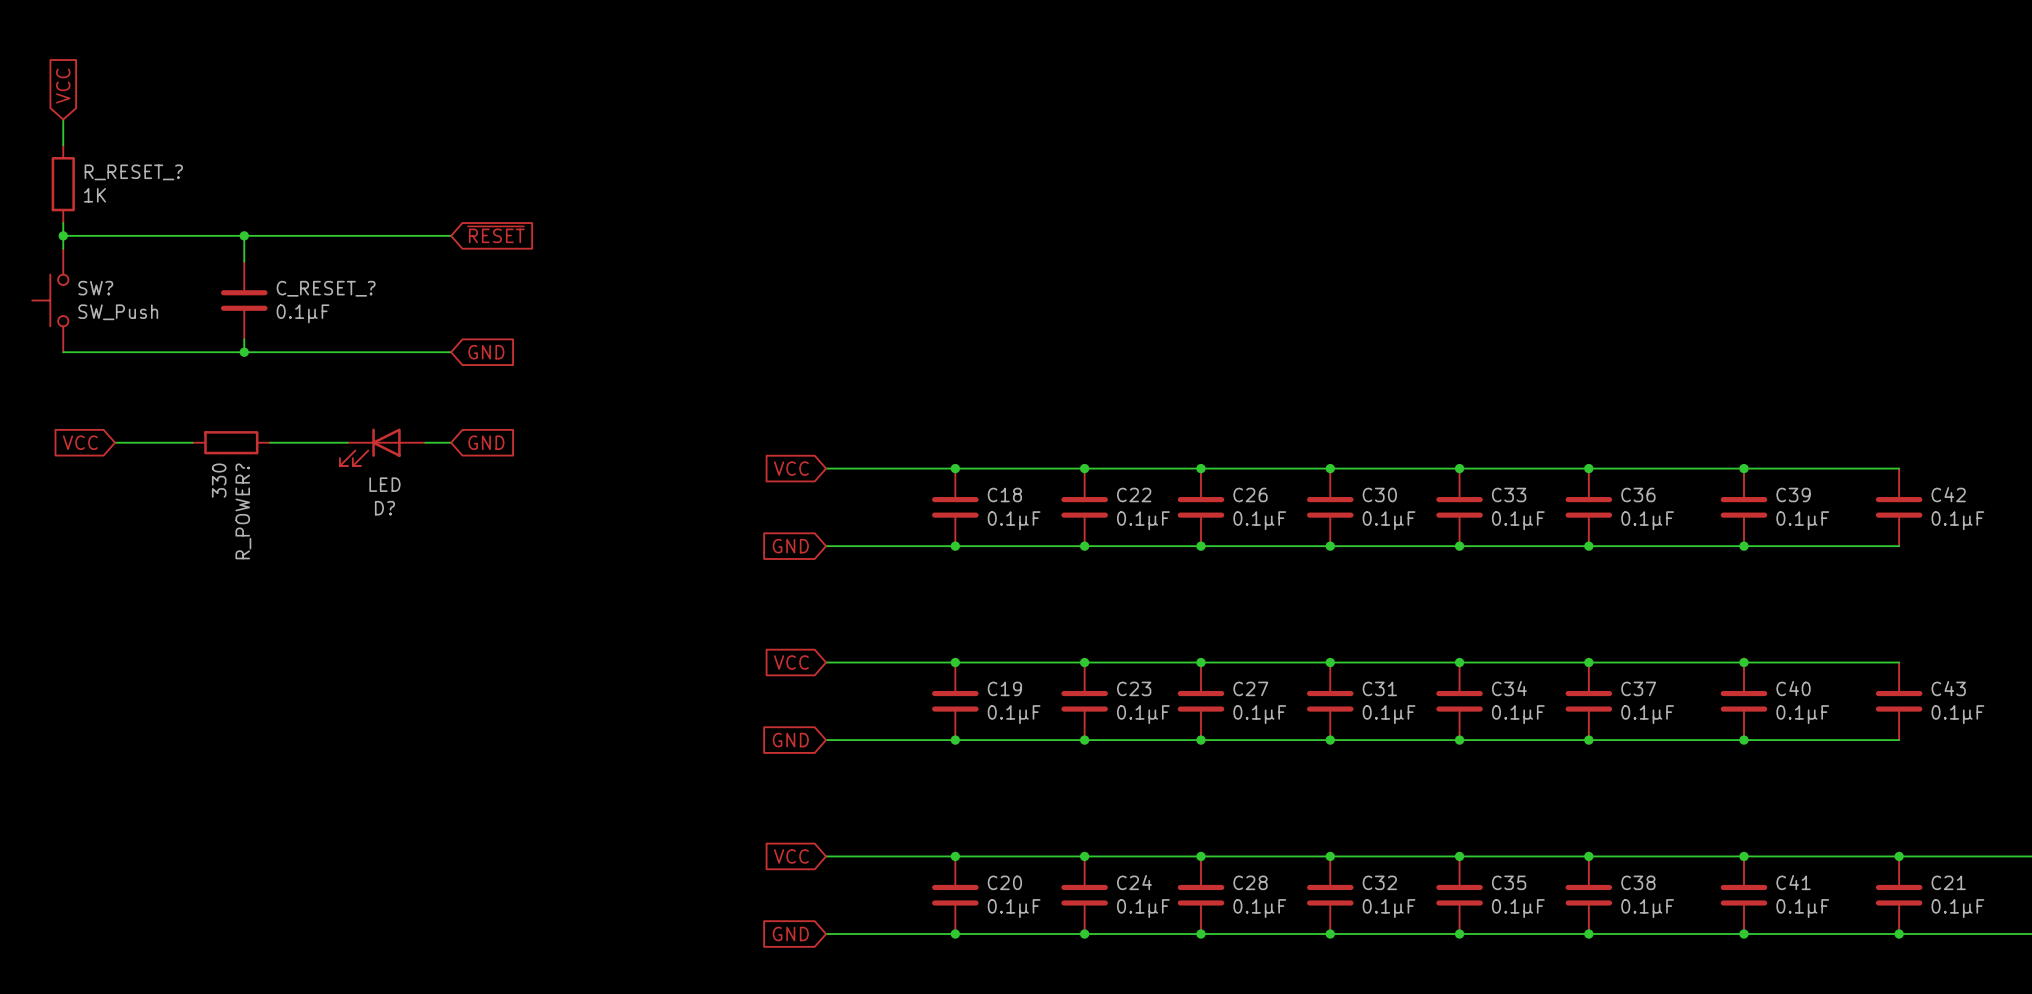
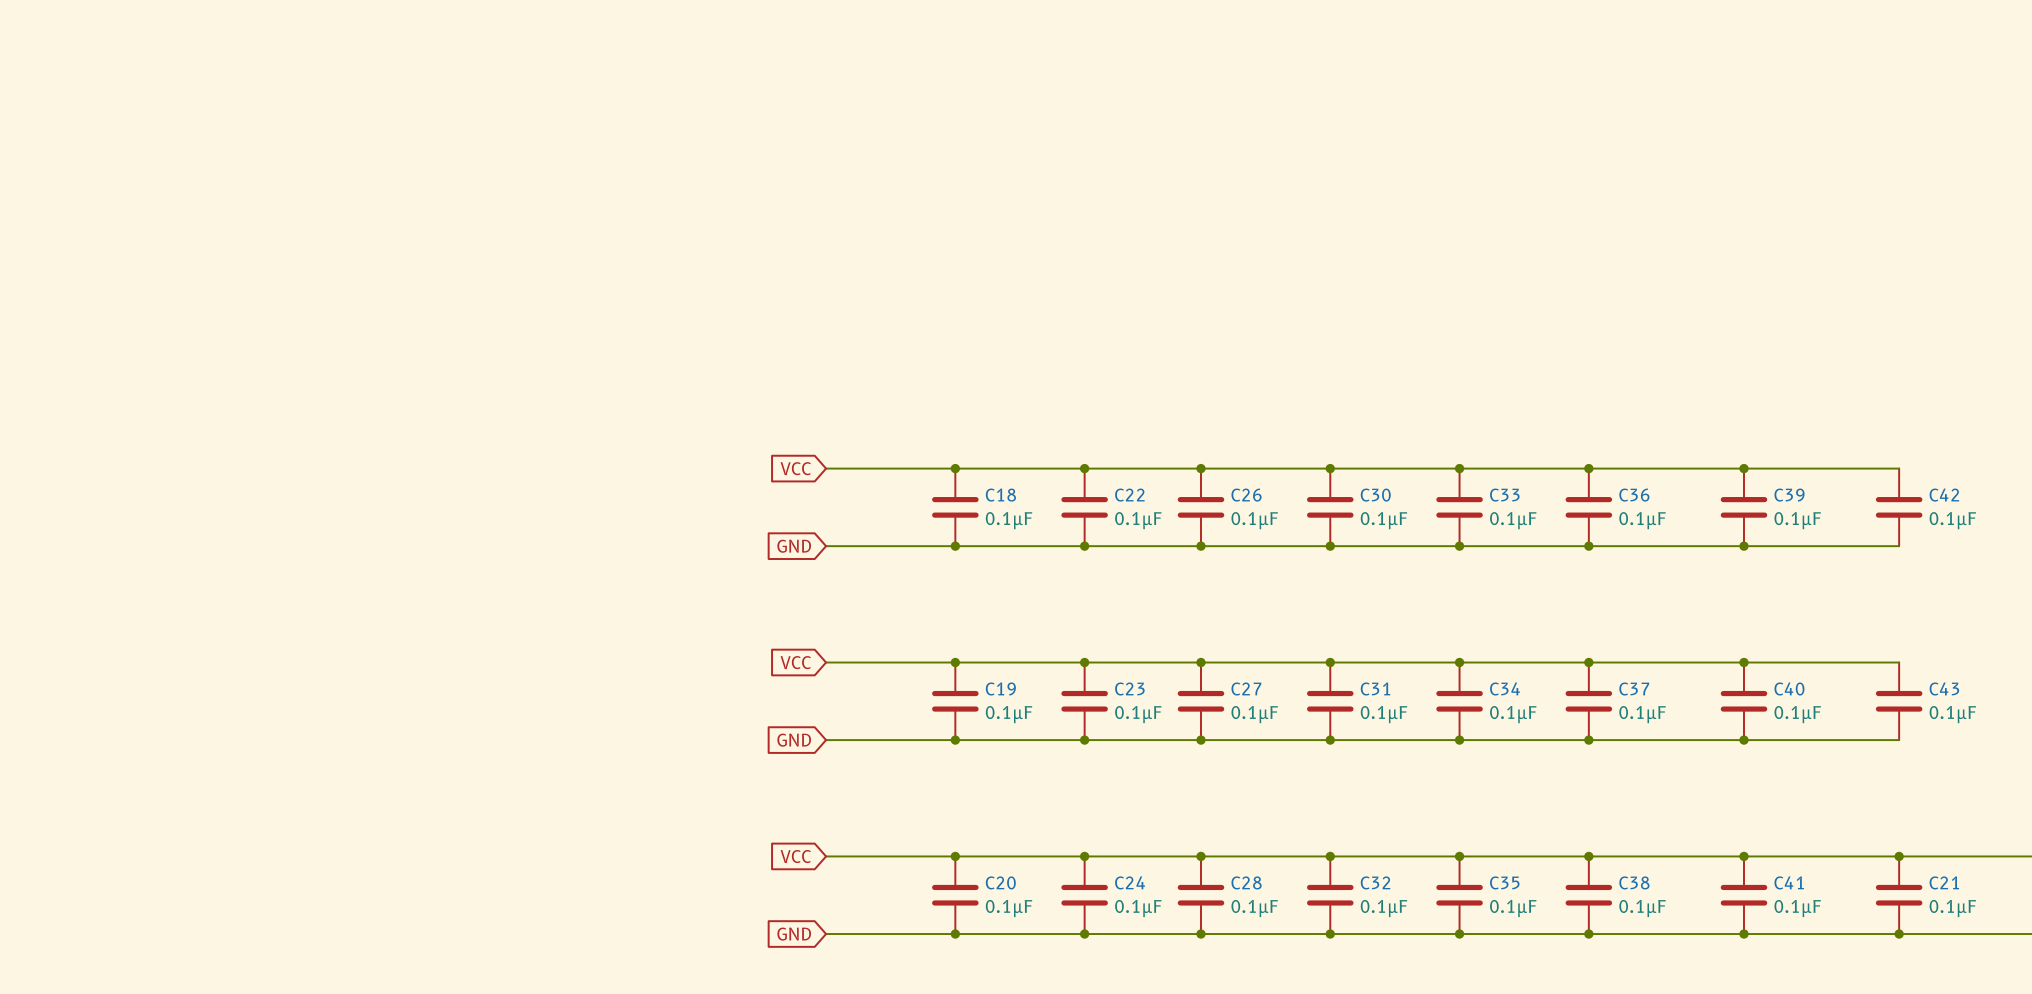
global label: VCC (63, 86) -> none
wire: (63, 119) (63, 145) -> none
R_RESET_?: 1K (63, 184) -> none
wire: (63, 222) (63, 248) -> none
global label: ~{RESET} (495, 234) -> none
wire: (63, 235) (451, 235) -> none
junction: (63, 235) -> none
wire: (244, 235) (244, 261) -> none
junction: (244, 235) -> none
SW?: SW_Push (50, 300) -> none
C_RESET_?: 0.1µF (244, 300) -> none
wire: (244, 339) (244, 352) -> none
wire: (63, 352) (451, 352) -> none
junction: (244, 352) -> none
global label: GND (486, 352) -> none
global label: VCC (80, 442) -> none
wire: (114, 442) (192, 442) -> none
R_POWER?: 330 (231, 442) -> none
wire: (270, 442) (347, 442) -> none
wire: (425, 442) (451, 442) -> none
global label: GND (486, 442) -> none
D?: LED (382, 447) -> none

